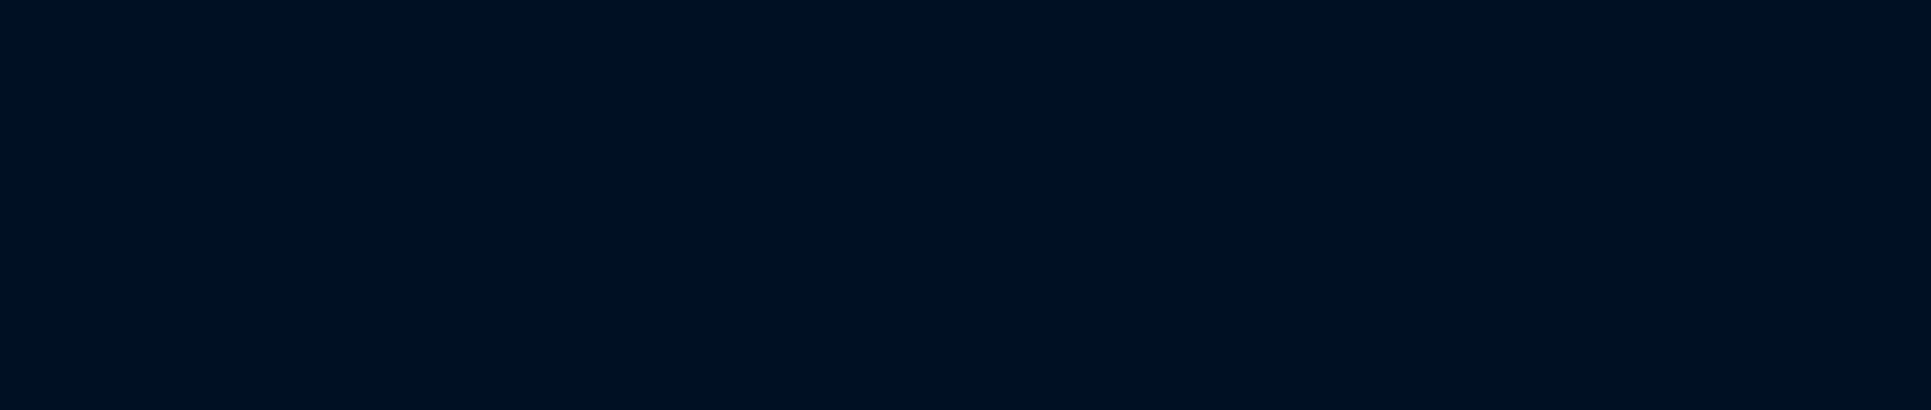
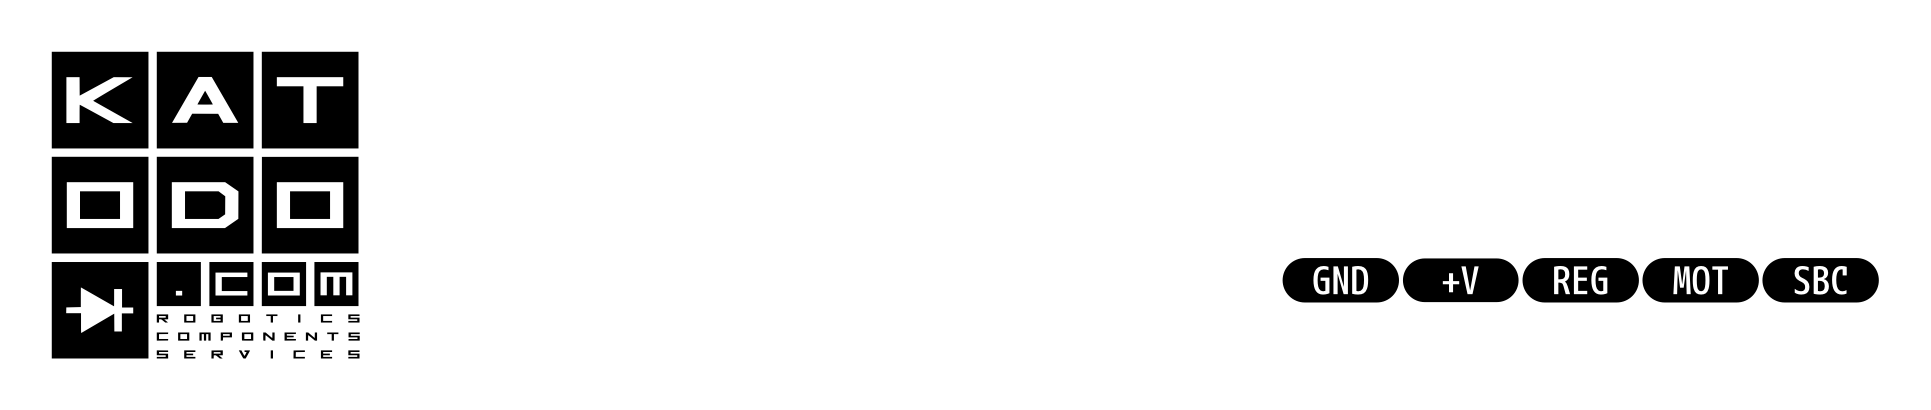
drawing: none -> [51, 51, 360, 359]
drawing: none -> [1282, 258, 1879, 303]

